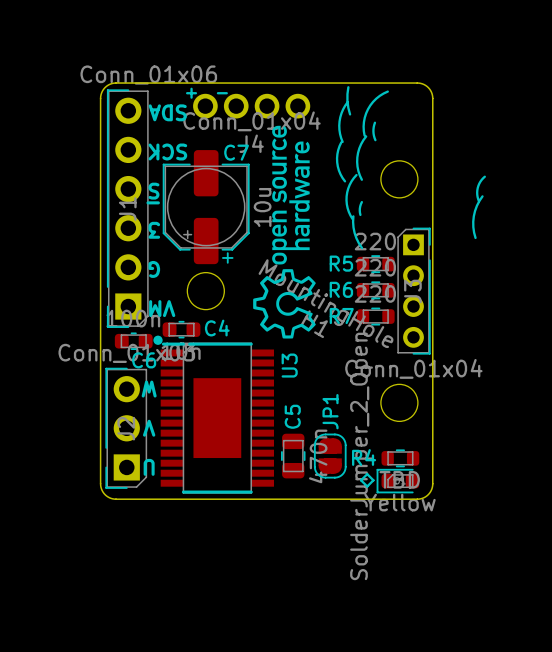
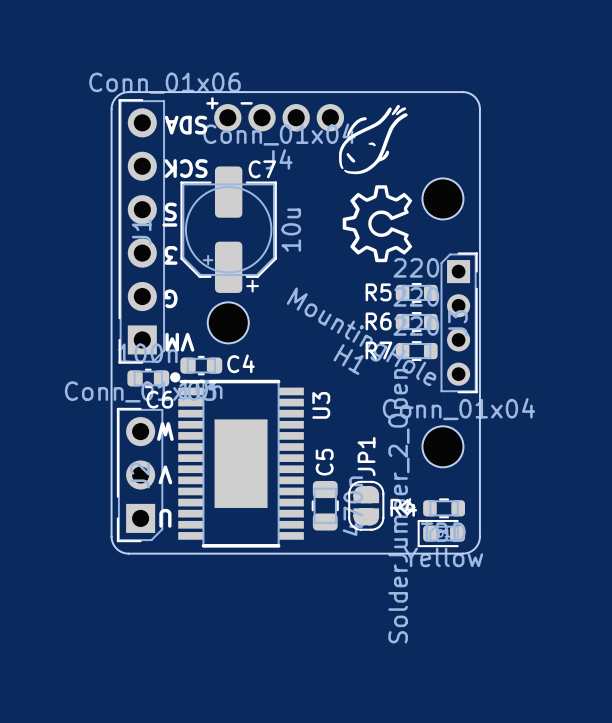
line: (348, 87) (347, 100) (350, 114) -> none
line: (387, 91) (376, 98) (368, 109) (363, 122) (364, 135) -> none
drawing: none -> [339, 104, 408, 175]
line: (347, 102) (339, 121) (342, 141) -> none
line: (374, 122) (373, 131) (375, 140) -> none
drawing: [272, 125, 310, 265] -> none
line: (366, 136) (361, 144) (357, 157) (357, 166) (361, 179) -> none
line: (341, 142) (337, 162) (345, 181) -> none
line: (356, 175) (349, 184) (346, 196) (347, 208) (352, 219) -> none
line: (484, 176) (477, 188) (478, 201) -> none
line: (482, 196) (473, 216) (475, 237) -> none
line: (361, 202) (360, 214) -> none
line: (353, 216) (354, 233) (362, 248) -> none
drawing position: (284, 303) -> (377, 223)
line: (367, 474) (361, 480) (367, 486) (373, 480) (367, 474) -> (407, 500) (400, 507) (407, 514) (414, 507) (407, 500)

